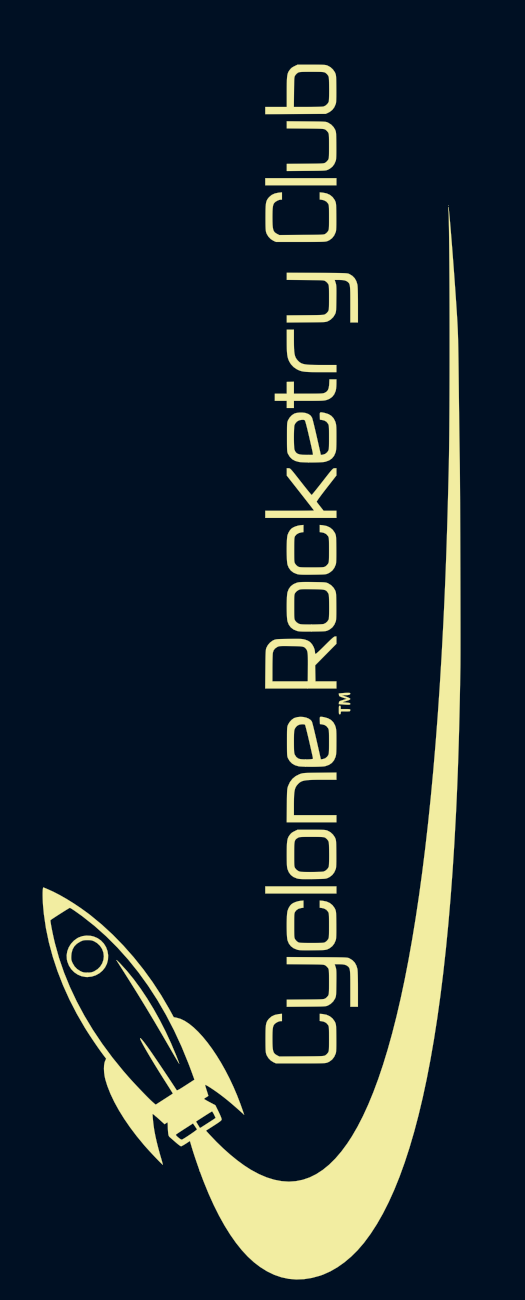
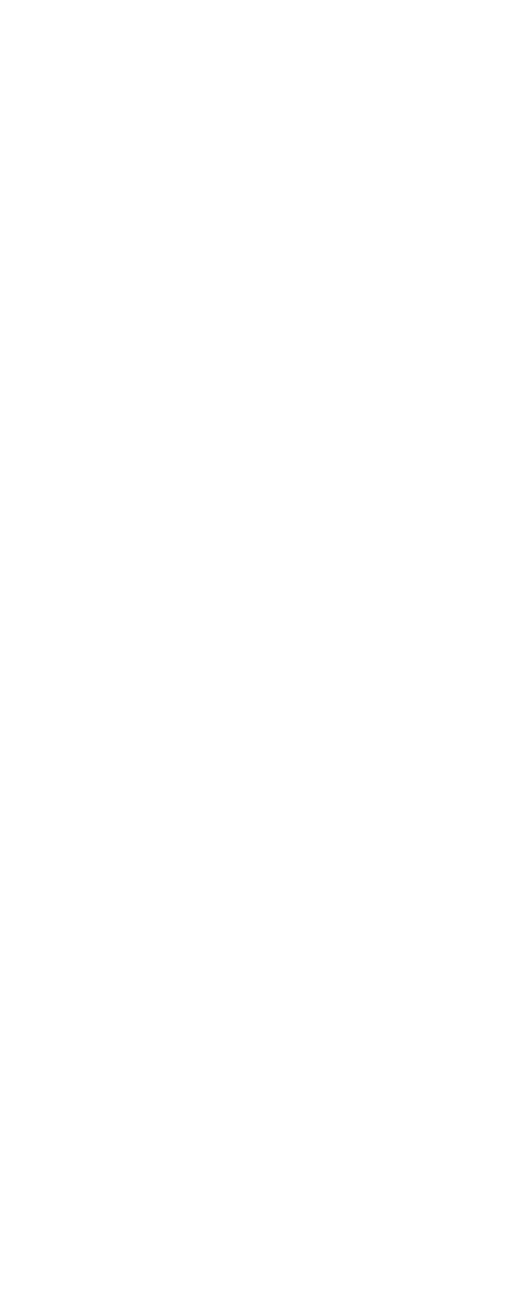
drawing: [42, 64, 461, 1280] -> none

